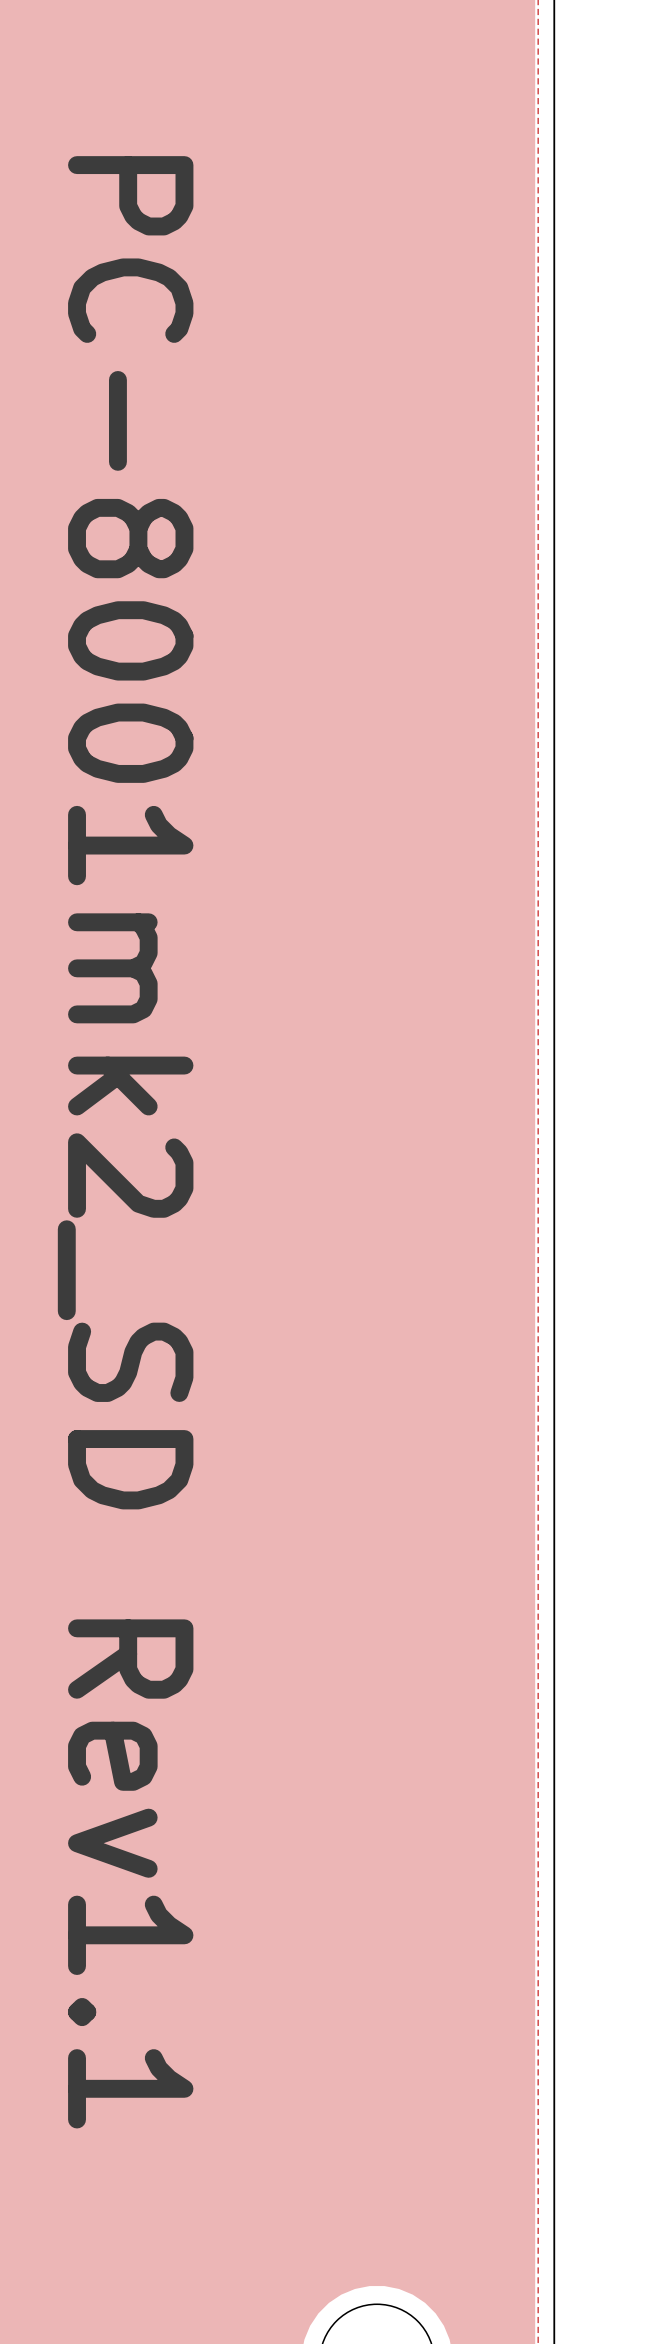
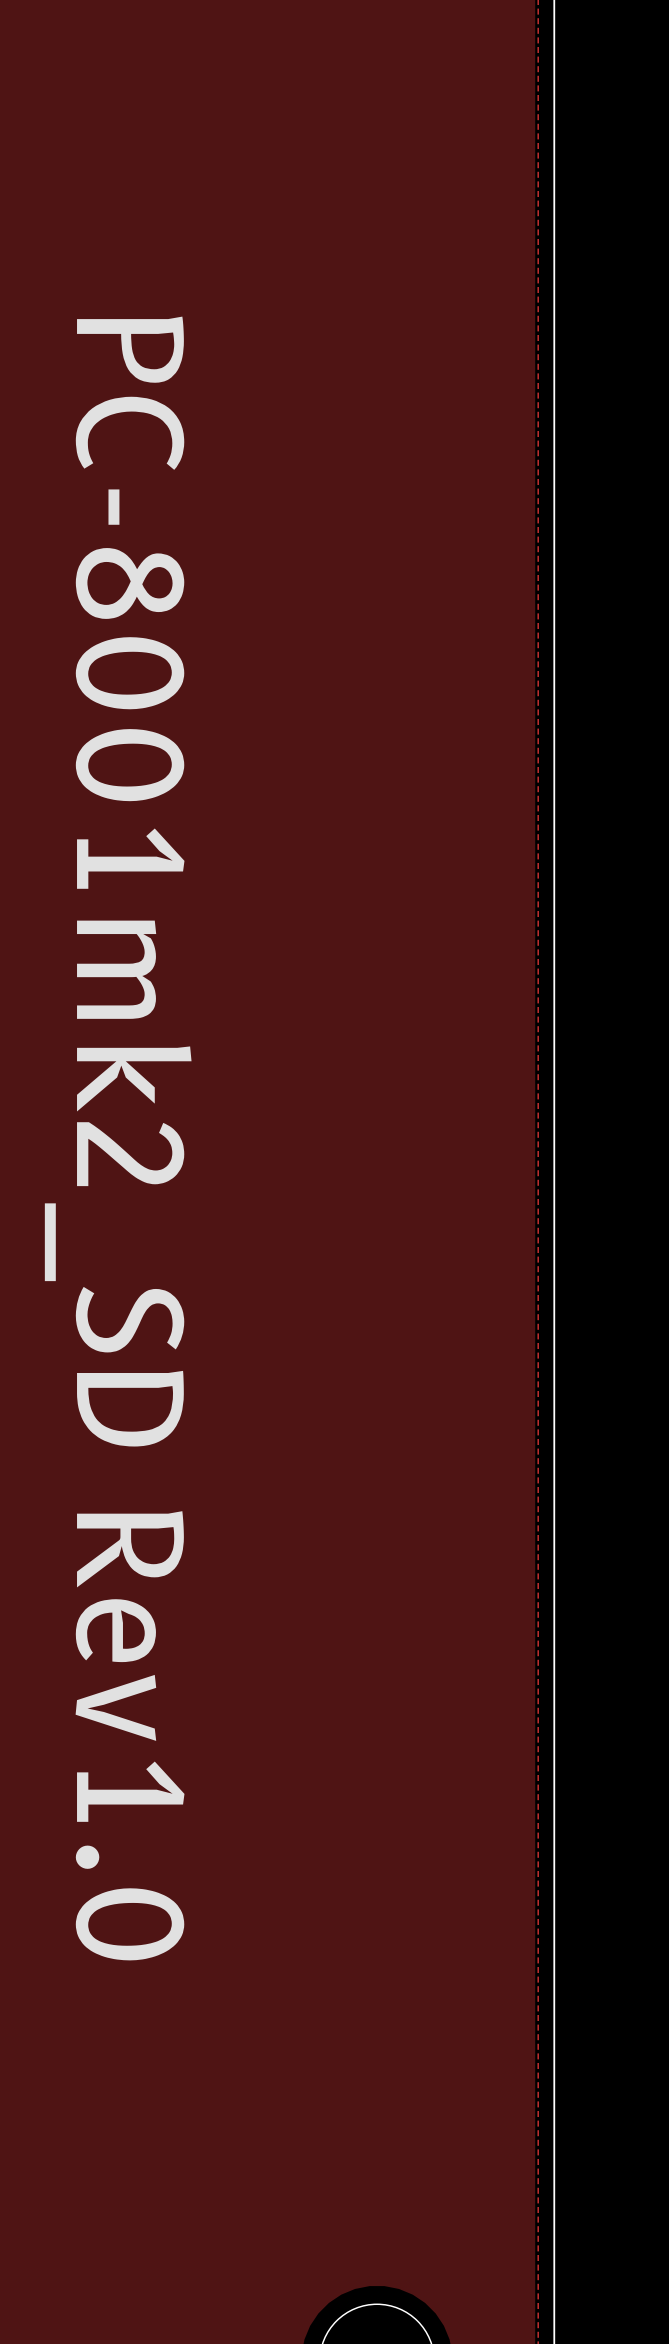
text: PC-8001mk2_SD Rev1.1 (125, 1142) -> PC-8001mk2_SD Rev1.0 (118, 1138)

